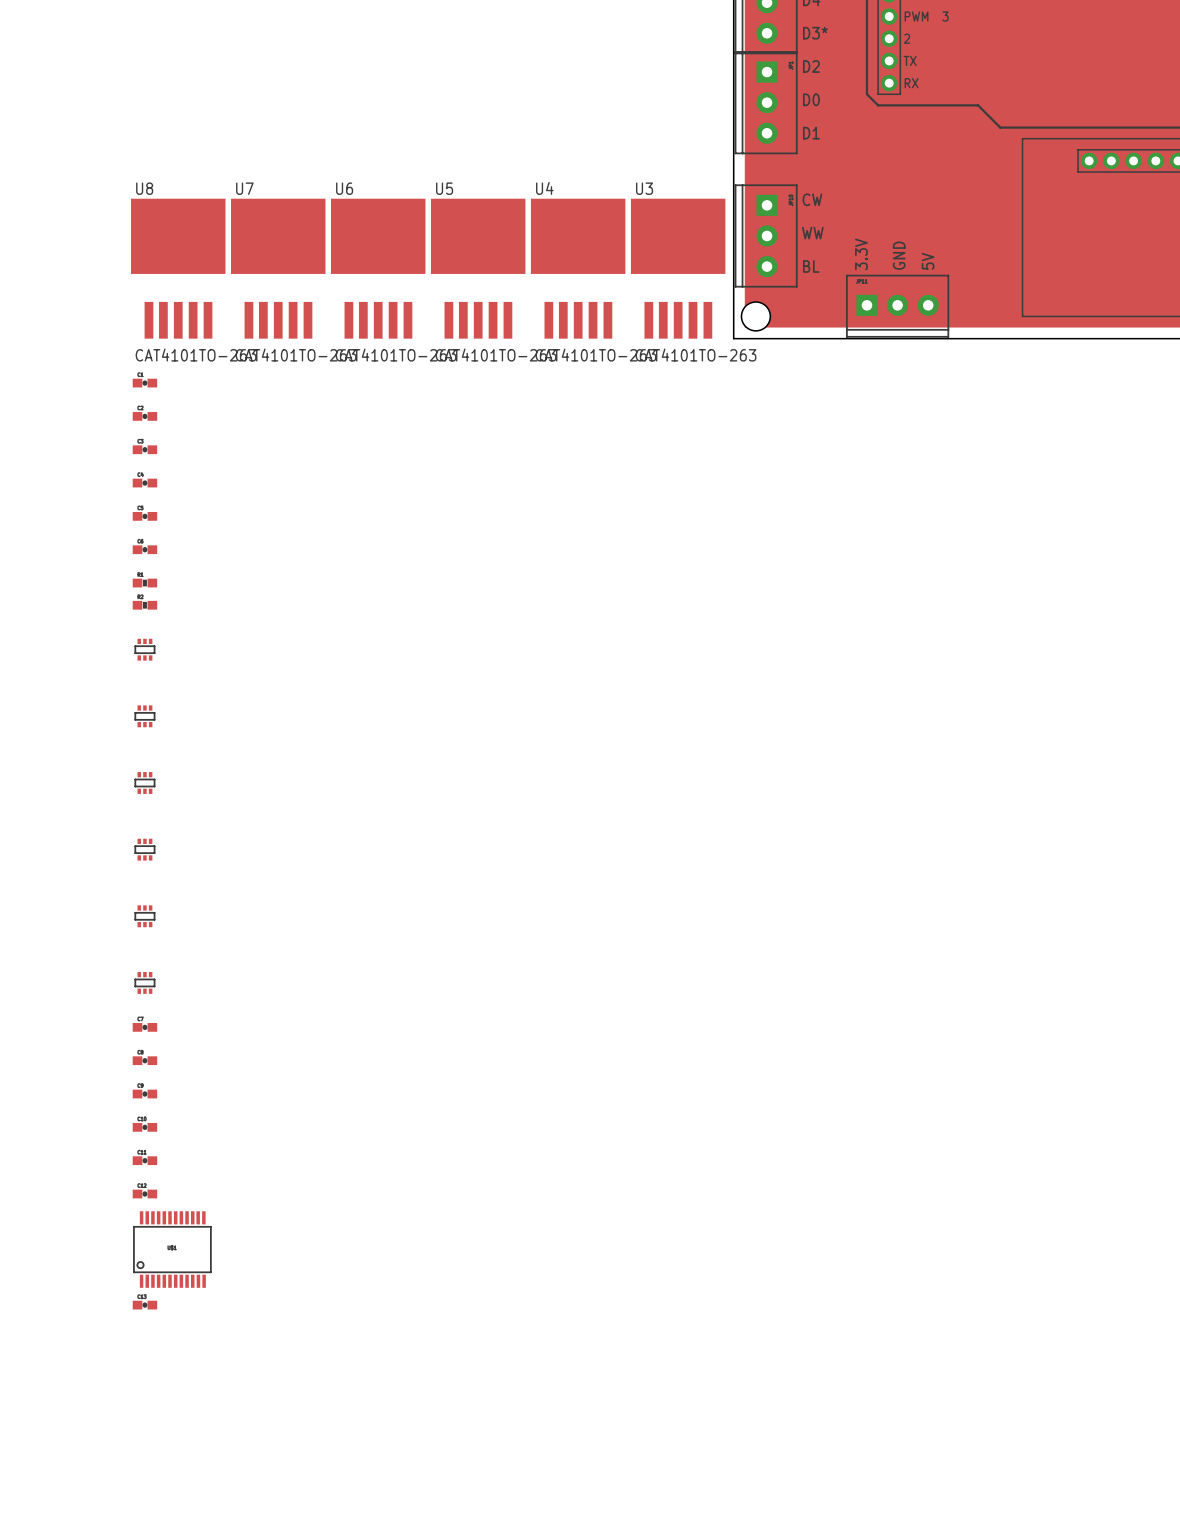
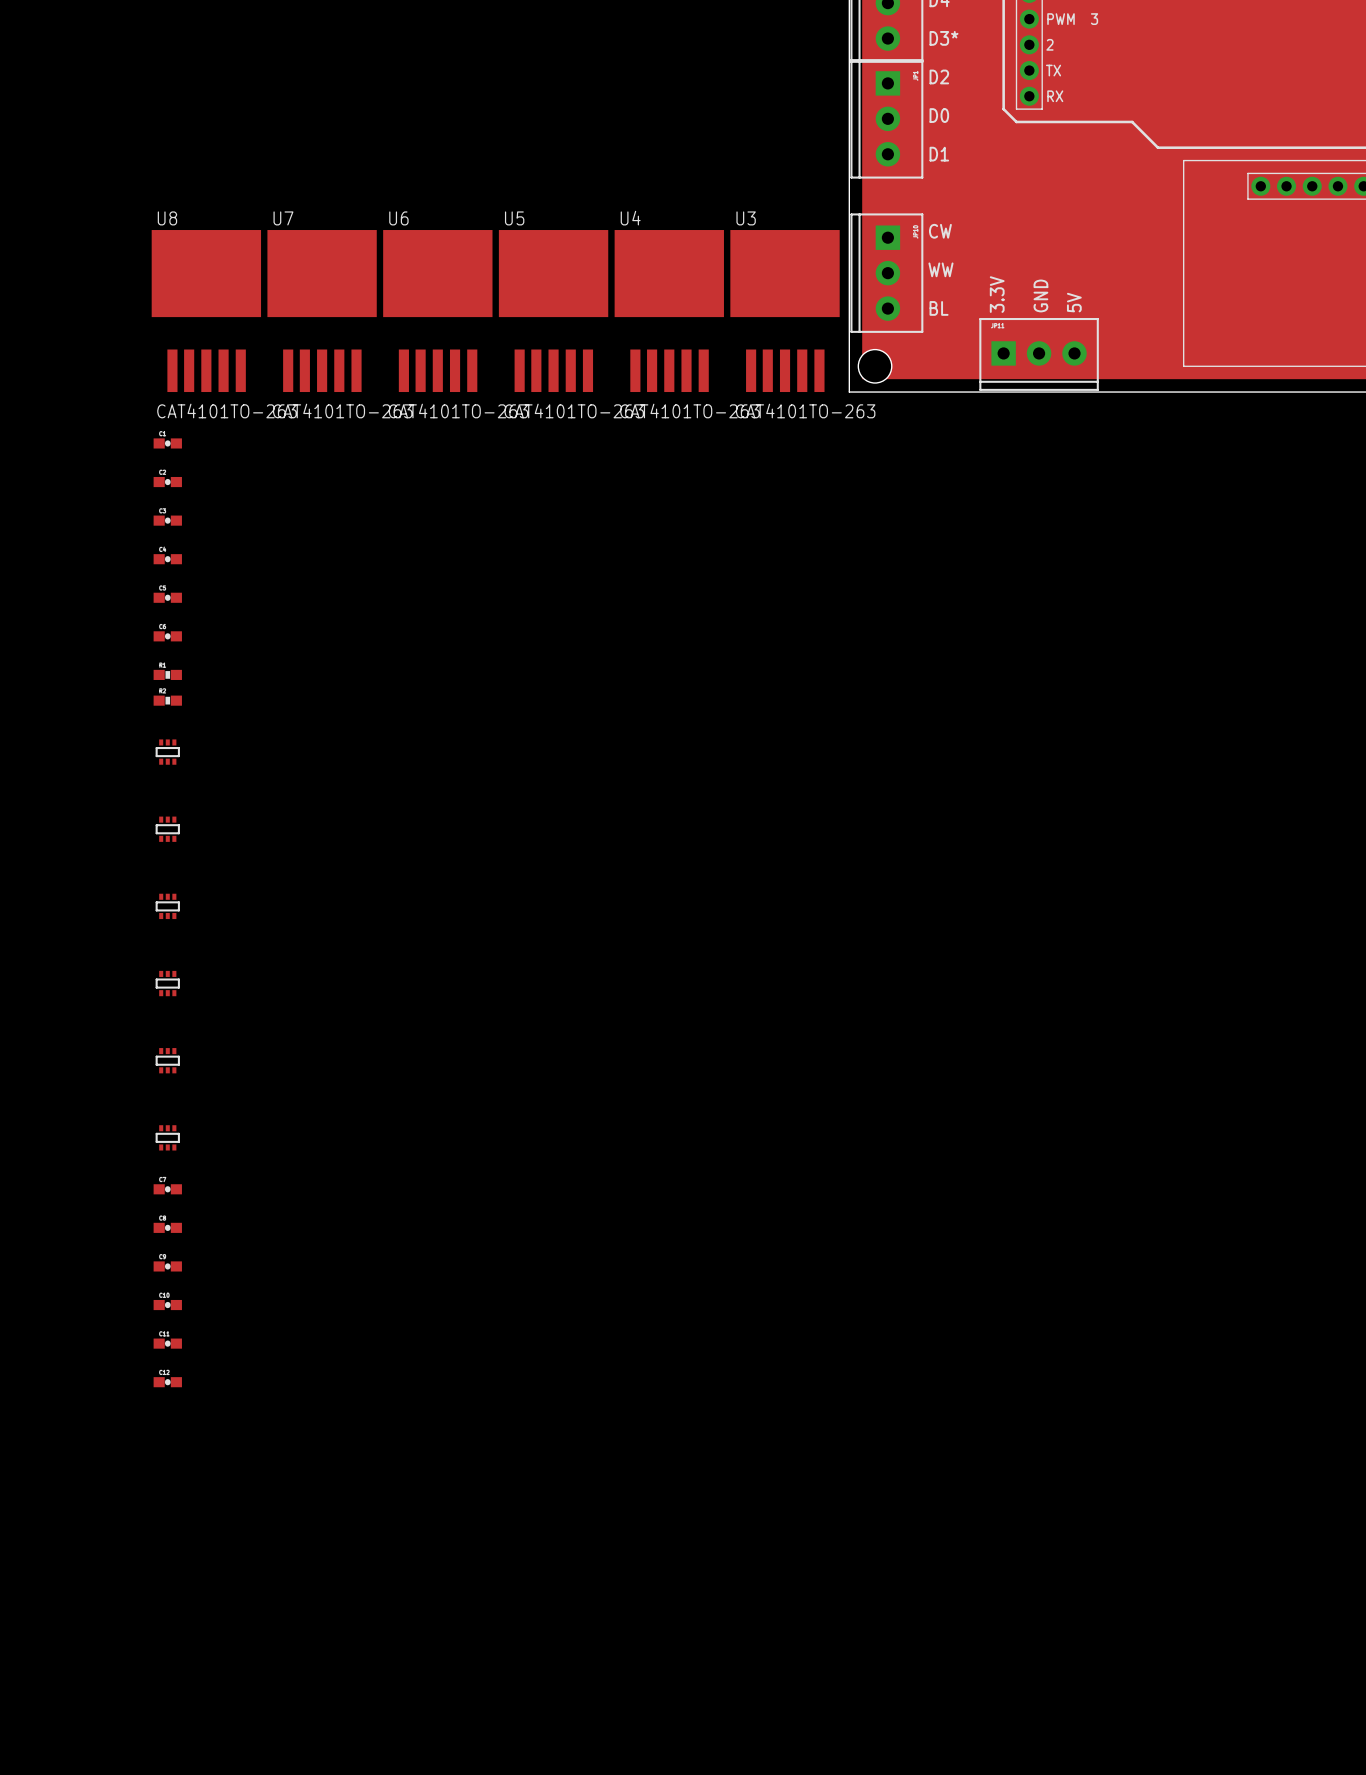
part: (172, 1249) -> none
part: (144, 1305) -> none

